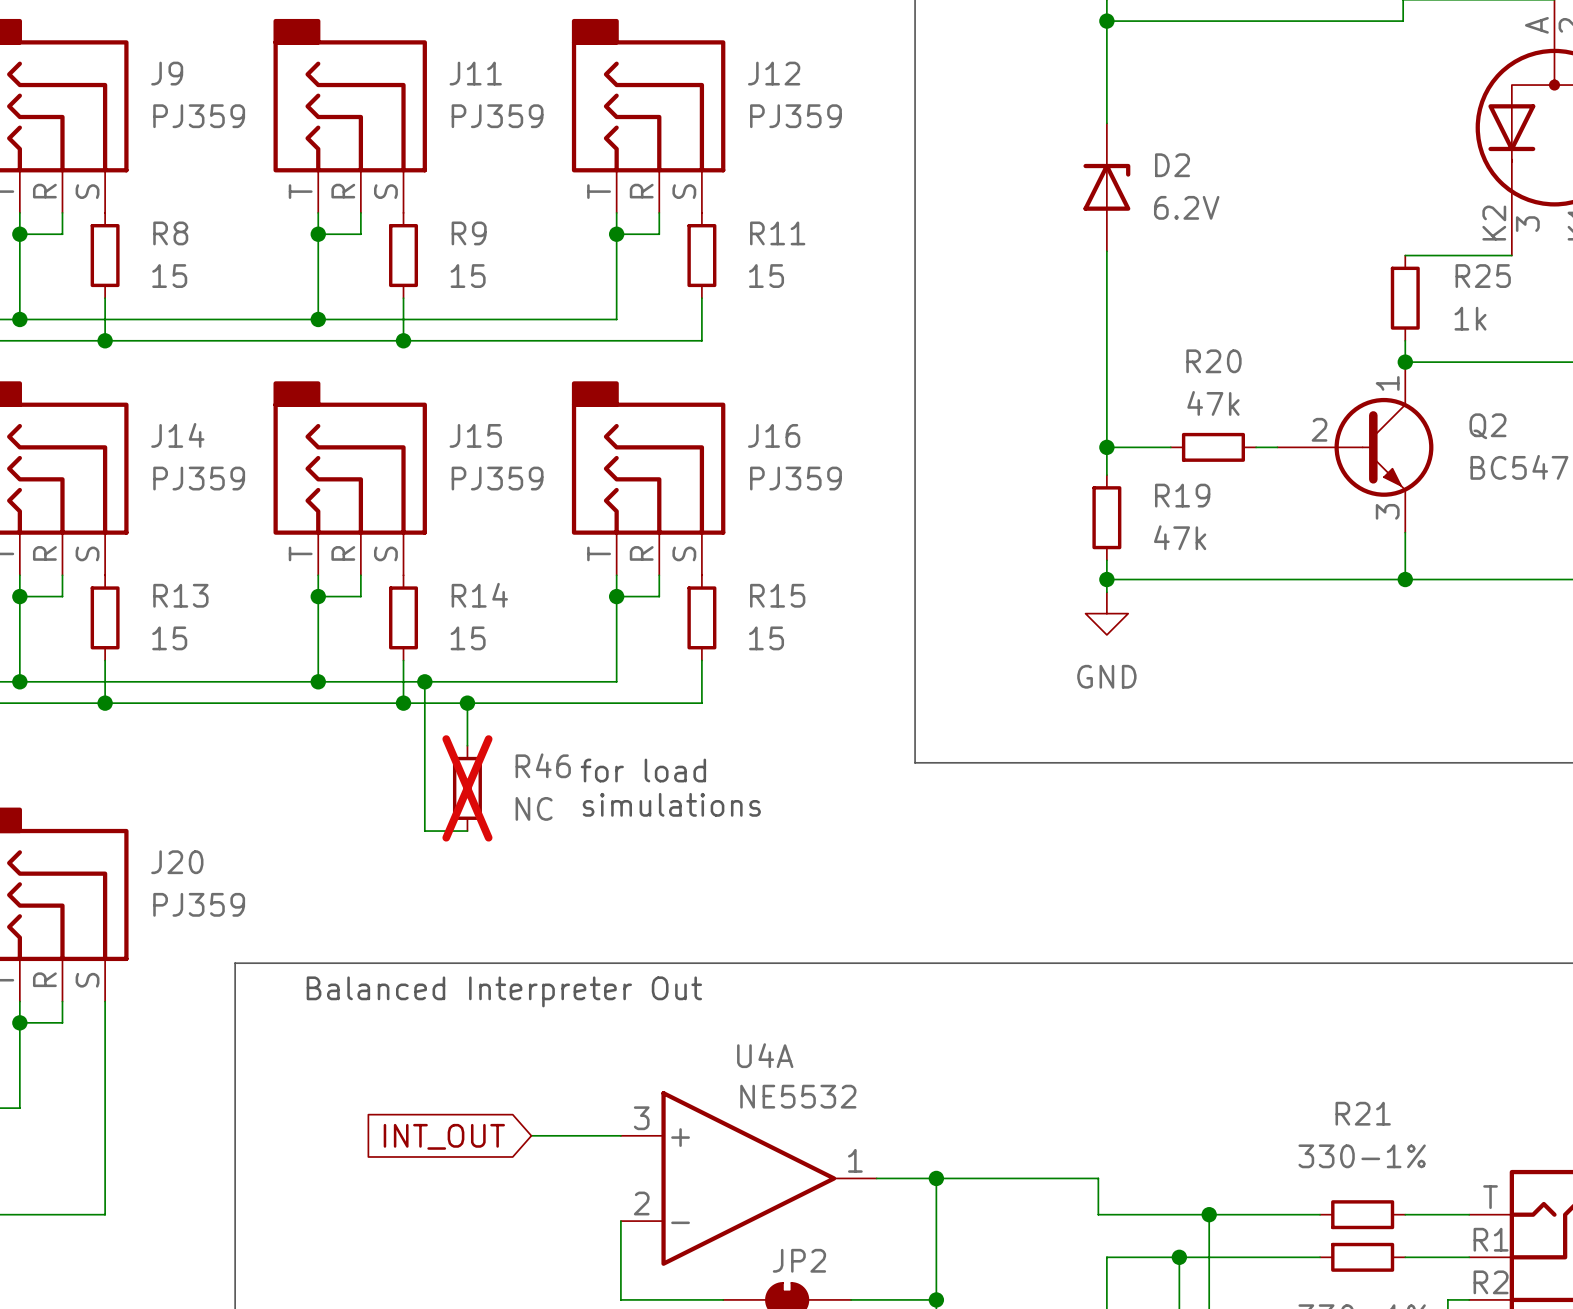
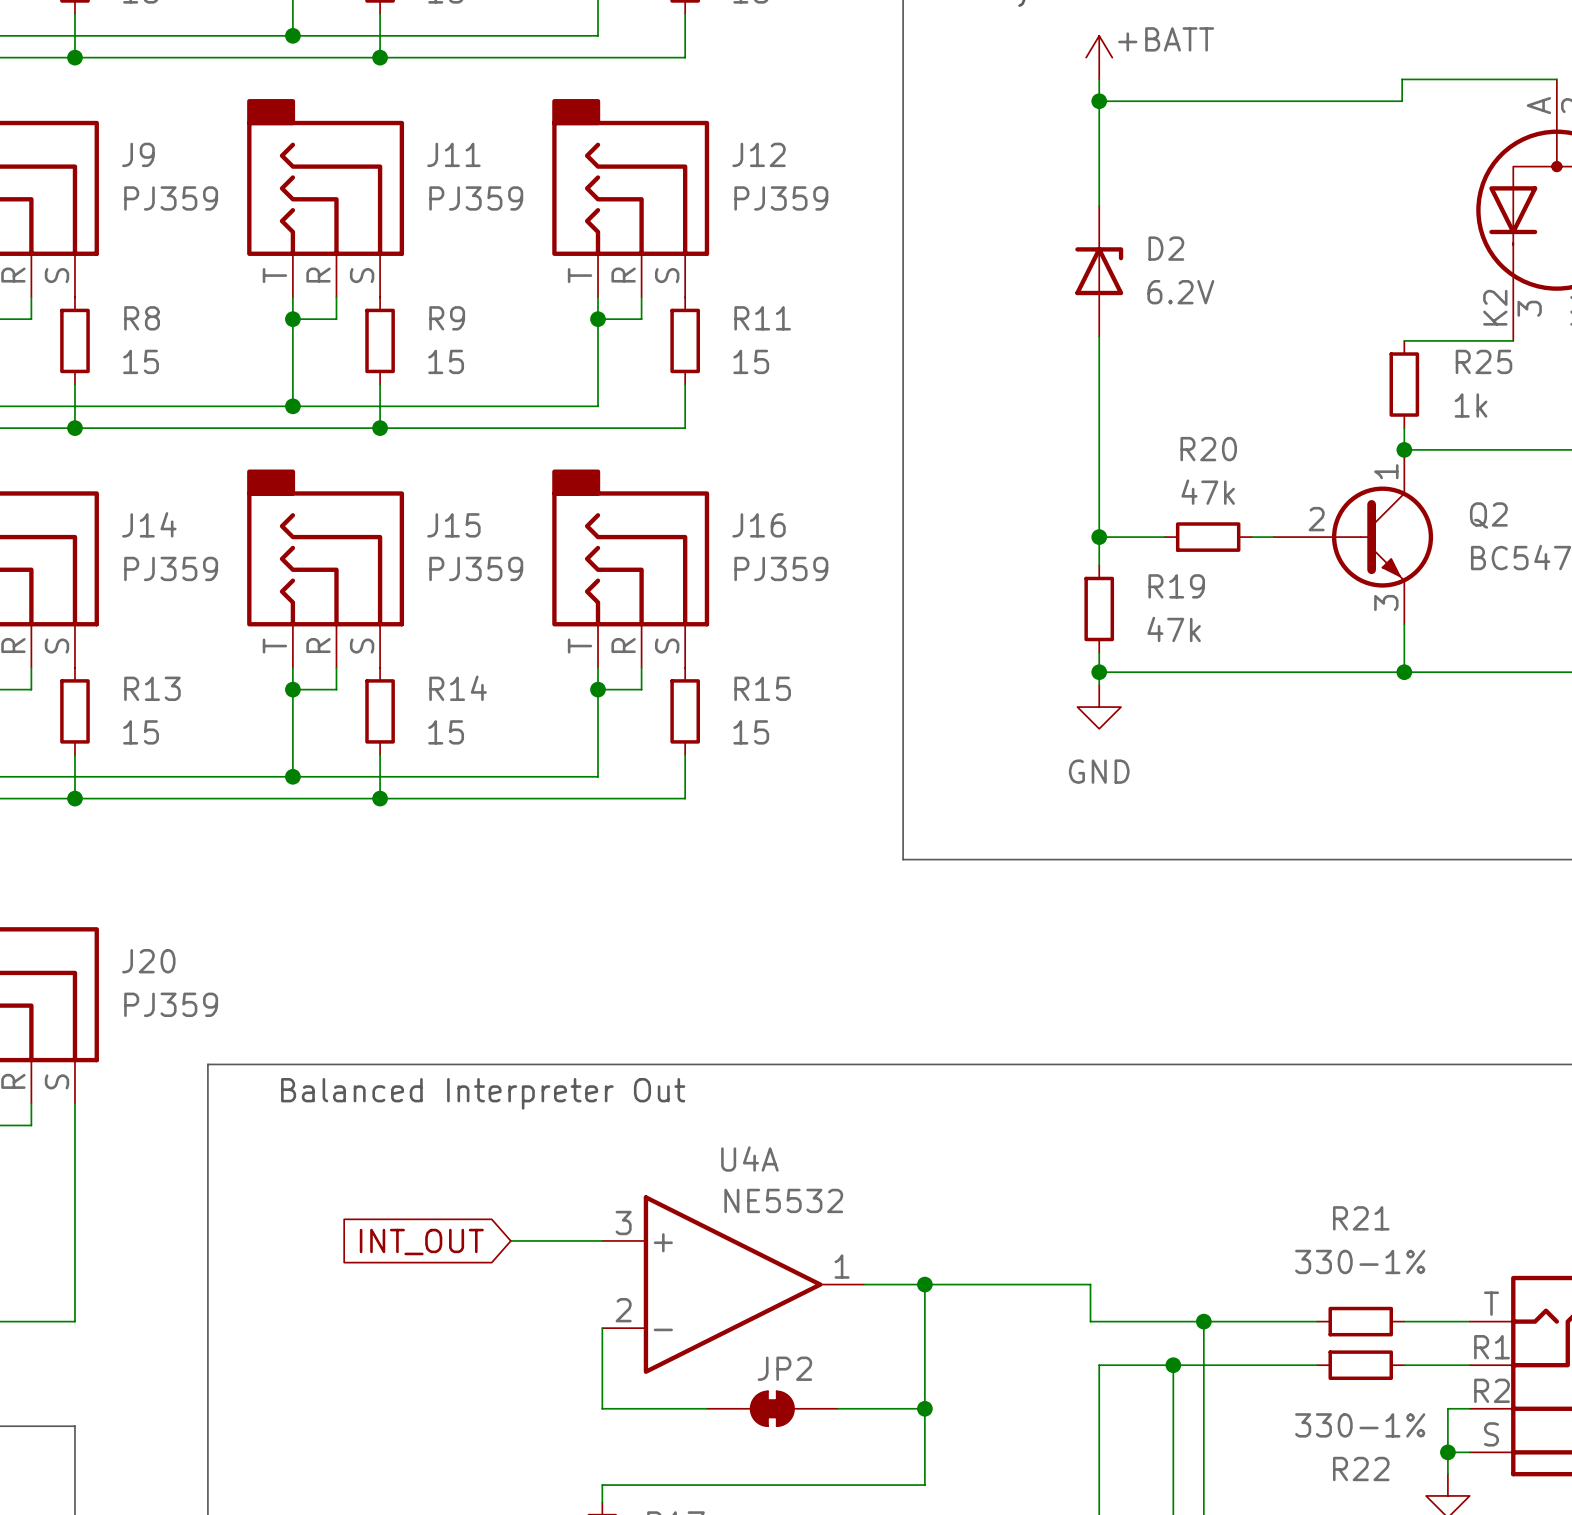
wire: (424, 681) (424, 831) (467, 831) -> none
junction: (424, 681) -> none
wire: (467, 703) (467, 745) -> none
junction: (467, 703) -> none
text: for load (643, 770) -> none
R46: NC (467, 788) -> none
text: simulations (671, 804) -> none

